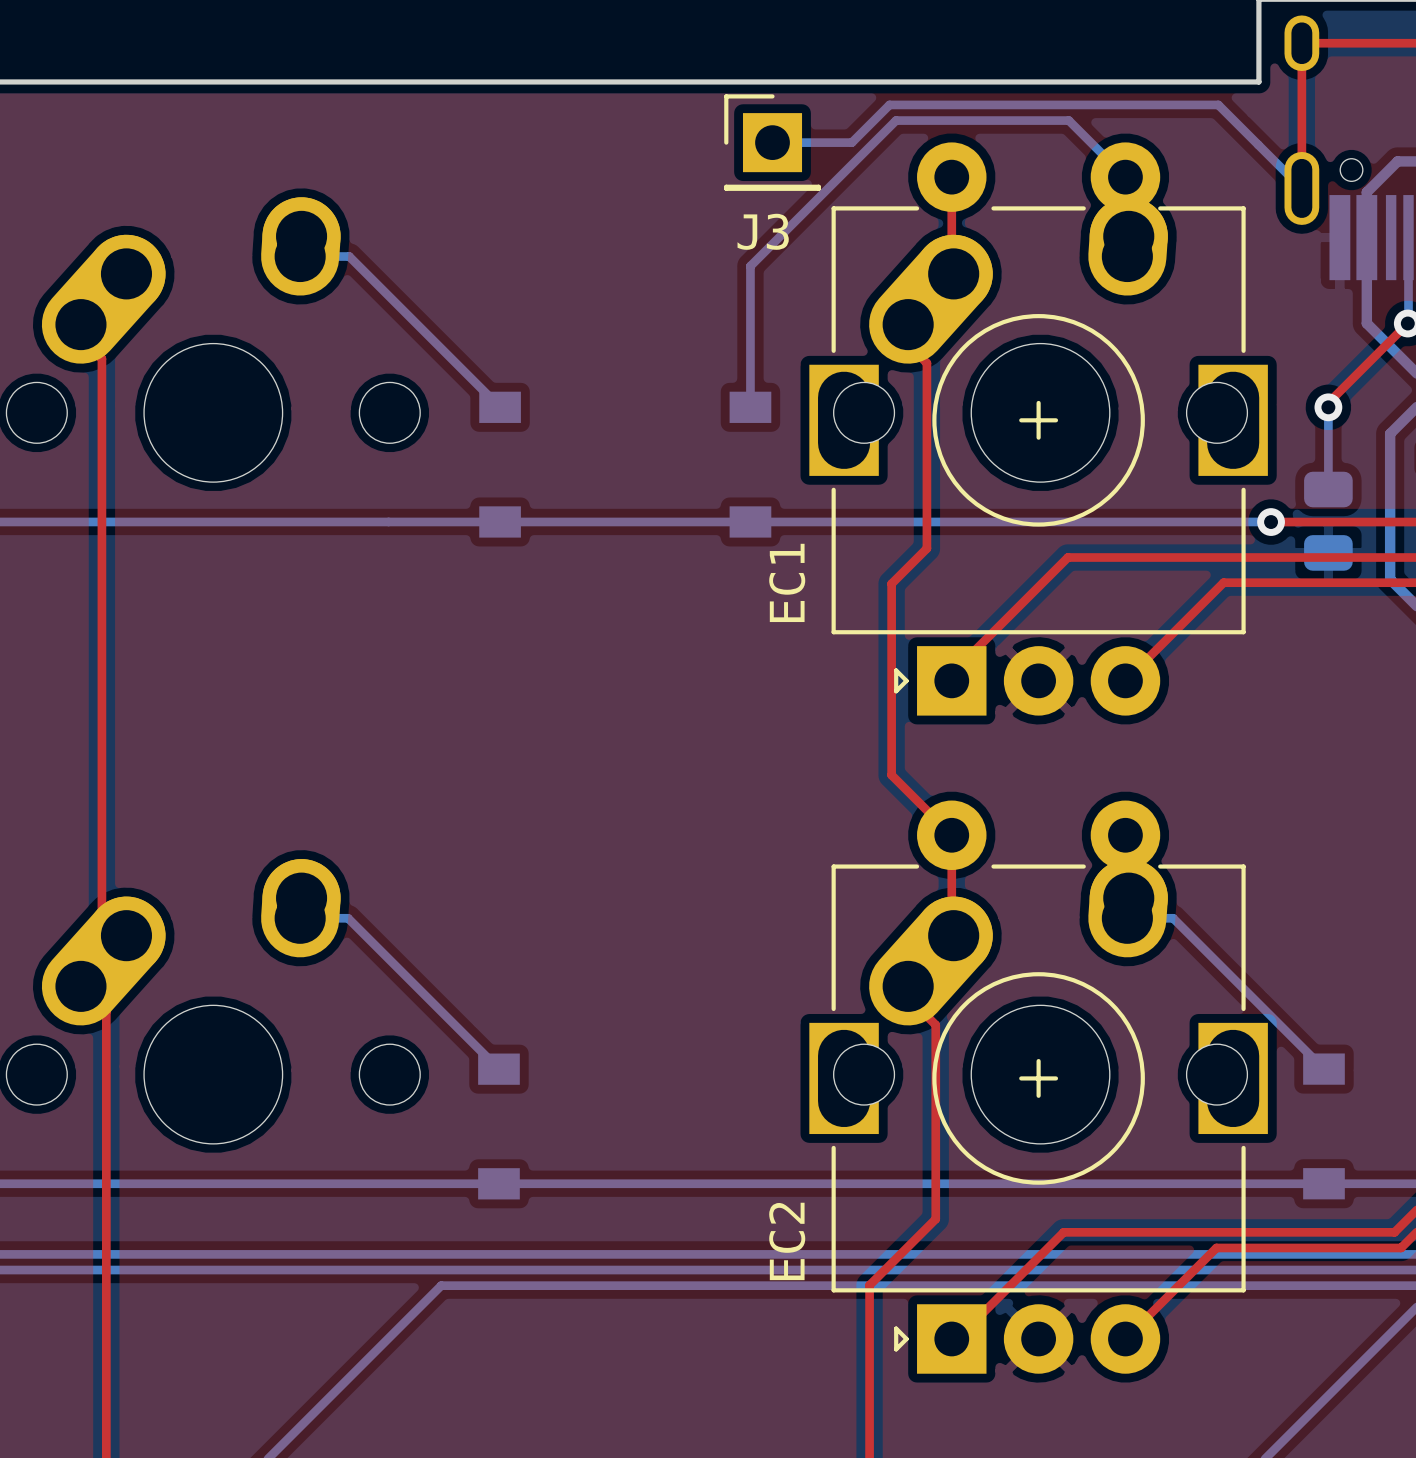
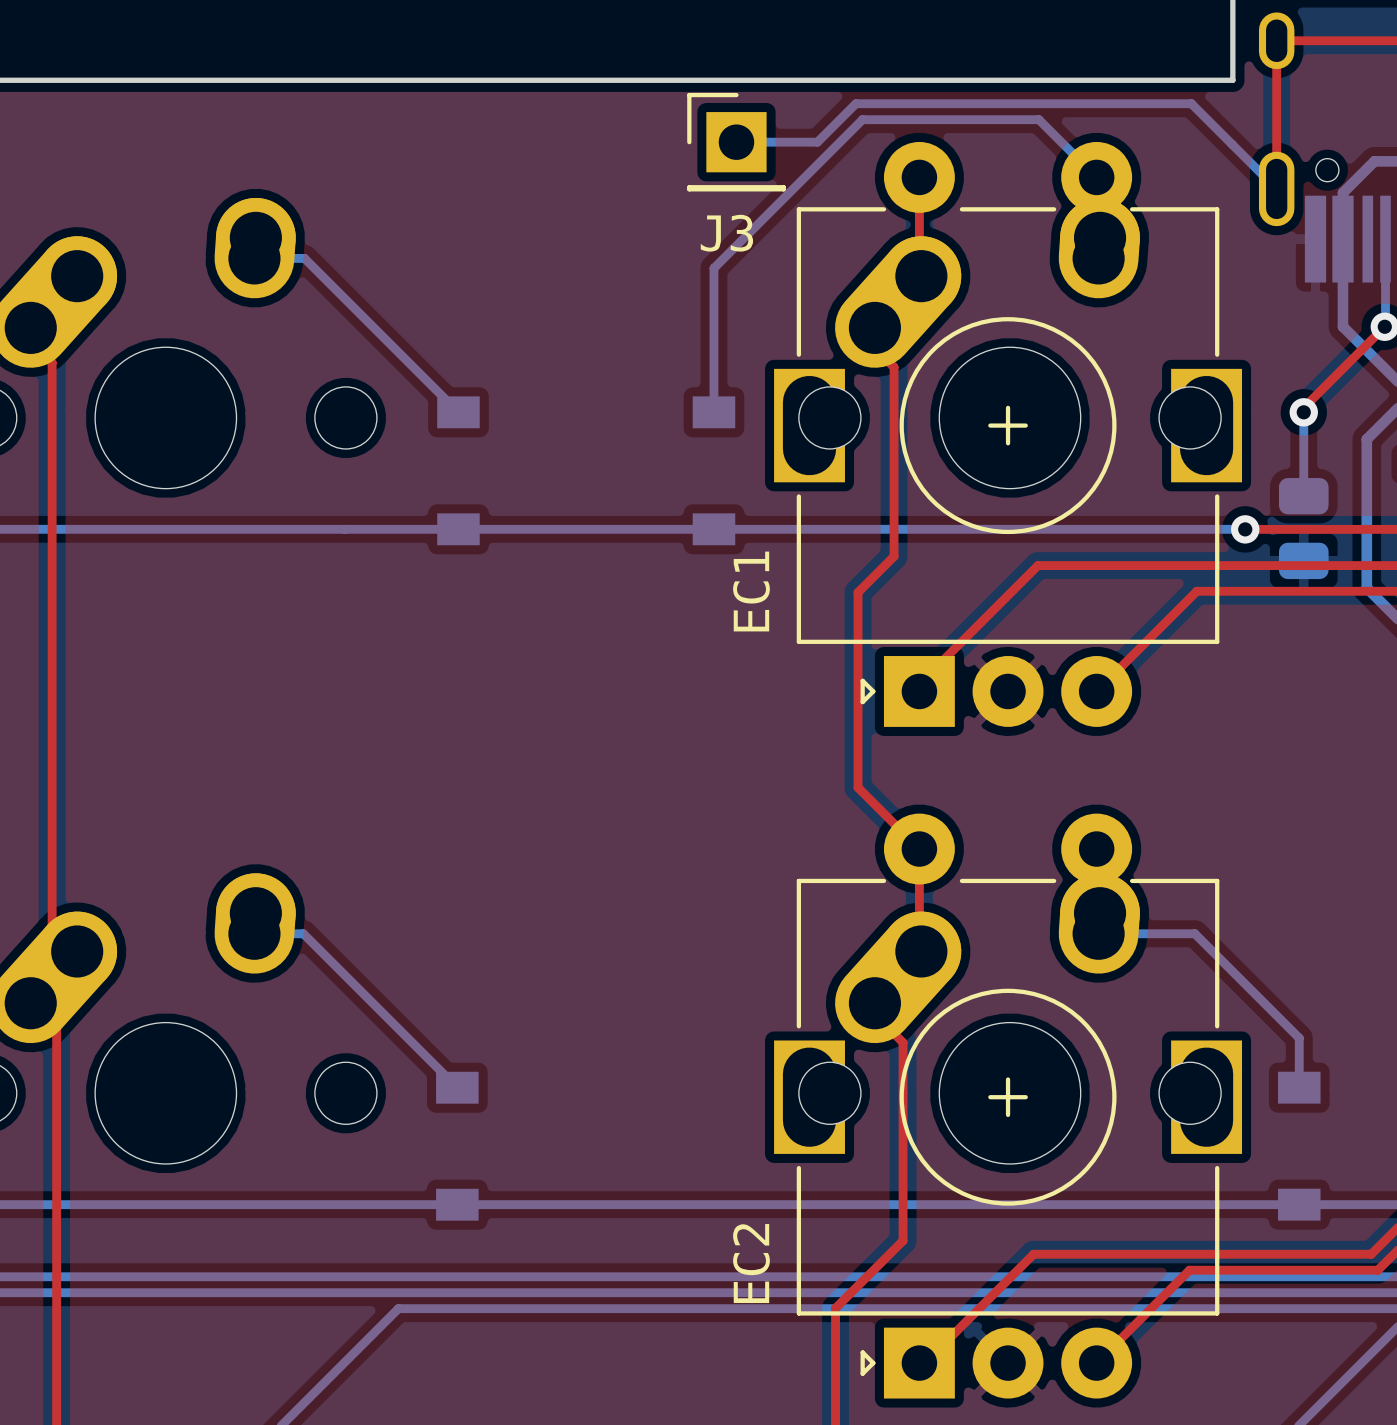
bottom track: (1173, 918) (1323, 1069) -> (1145, 933) (1194, 933) (1299, 1038) (1299, 1087)

